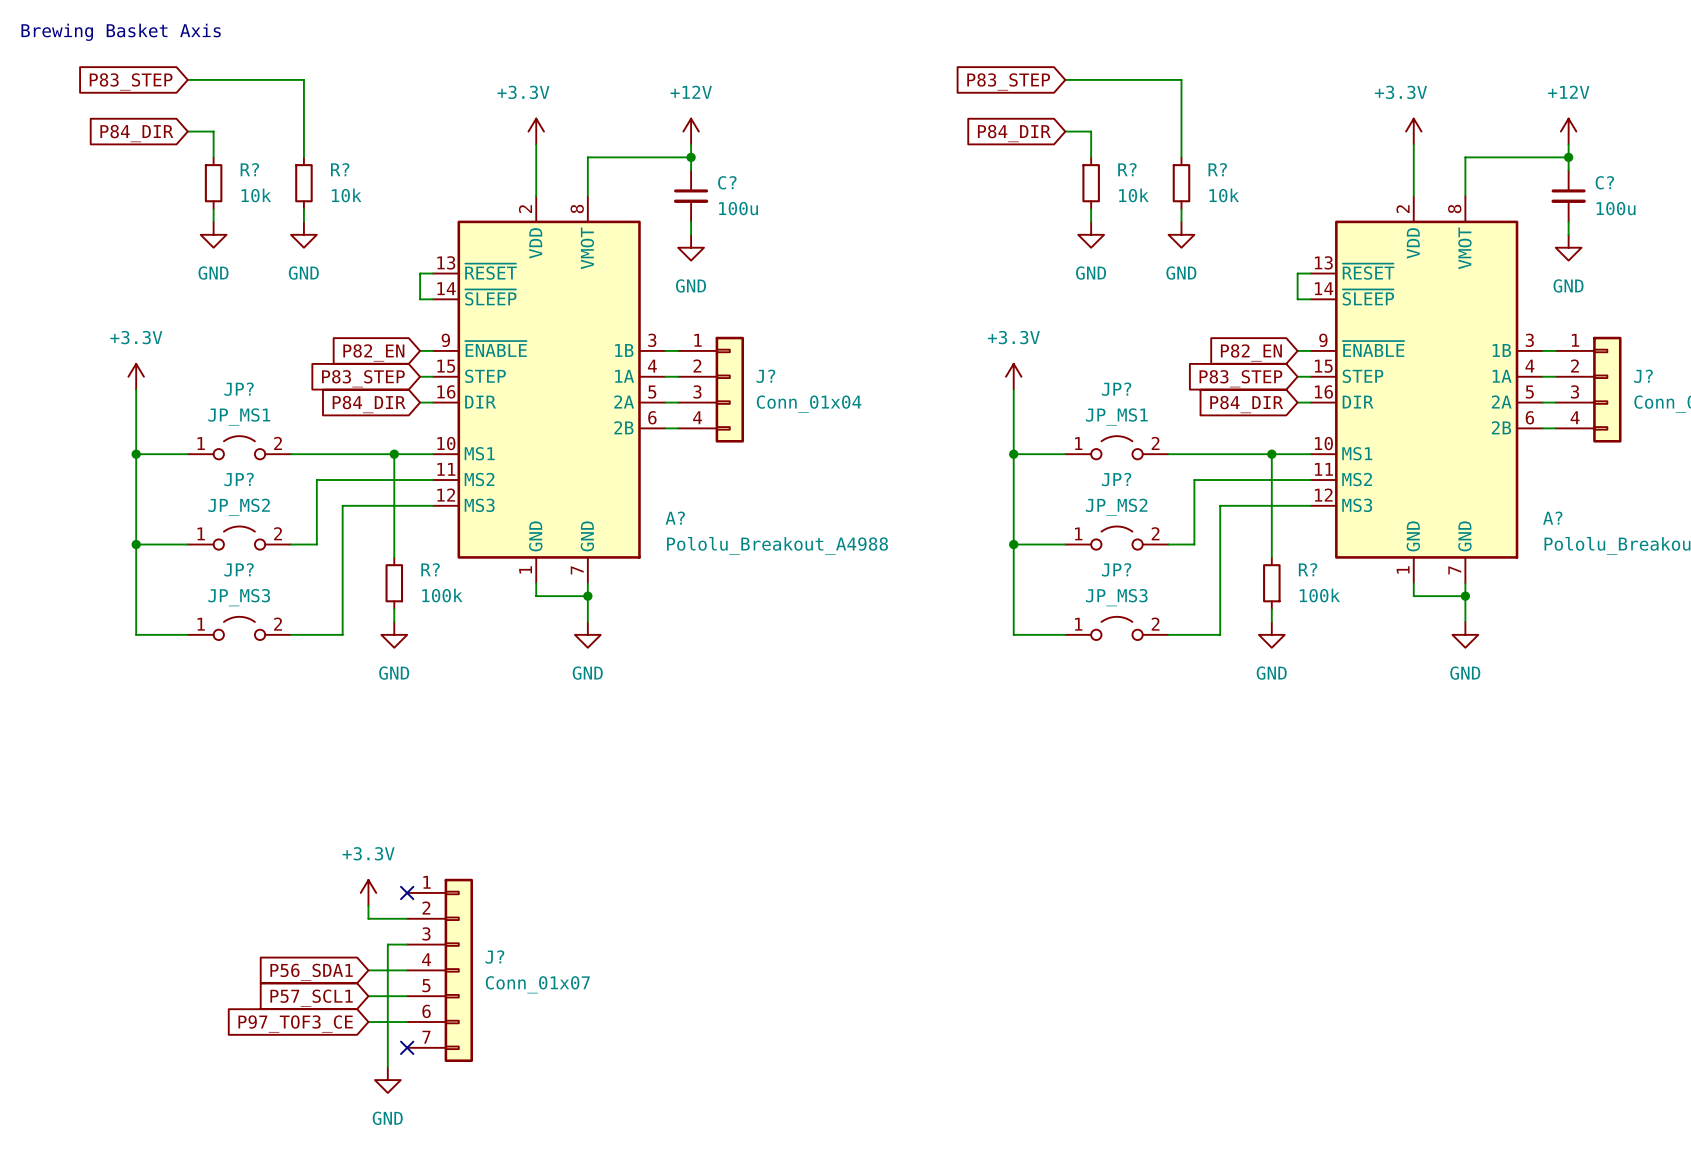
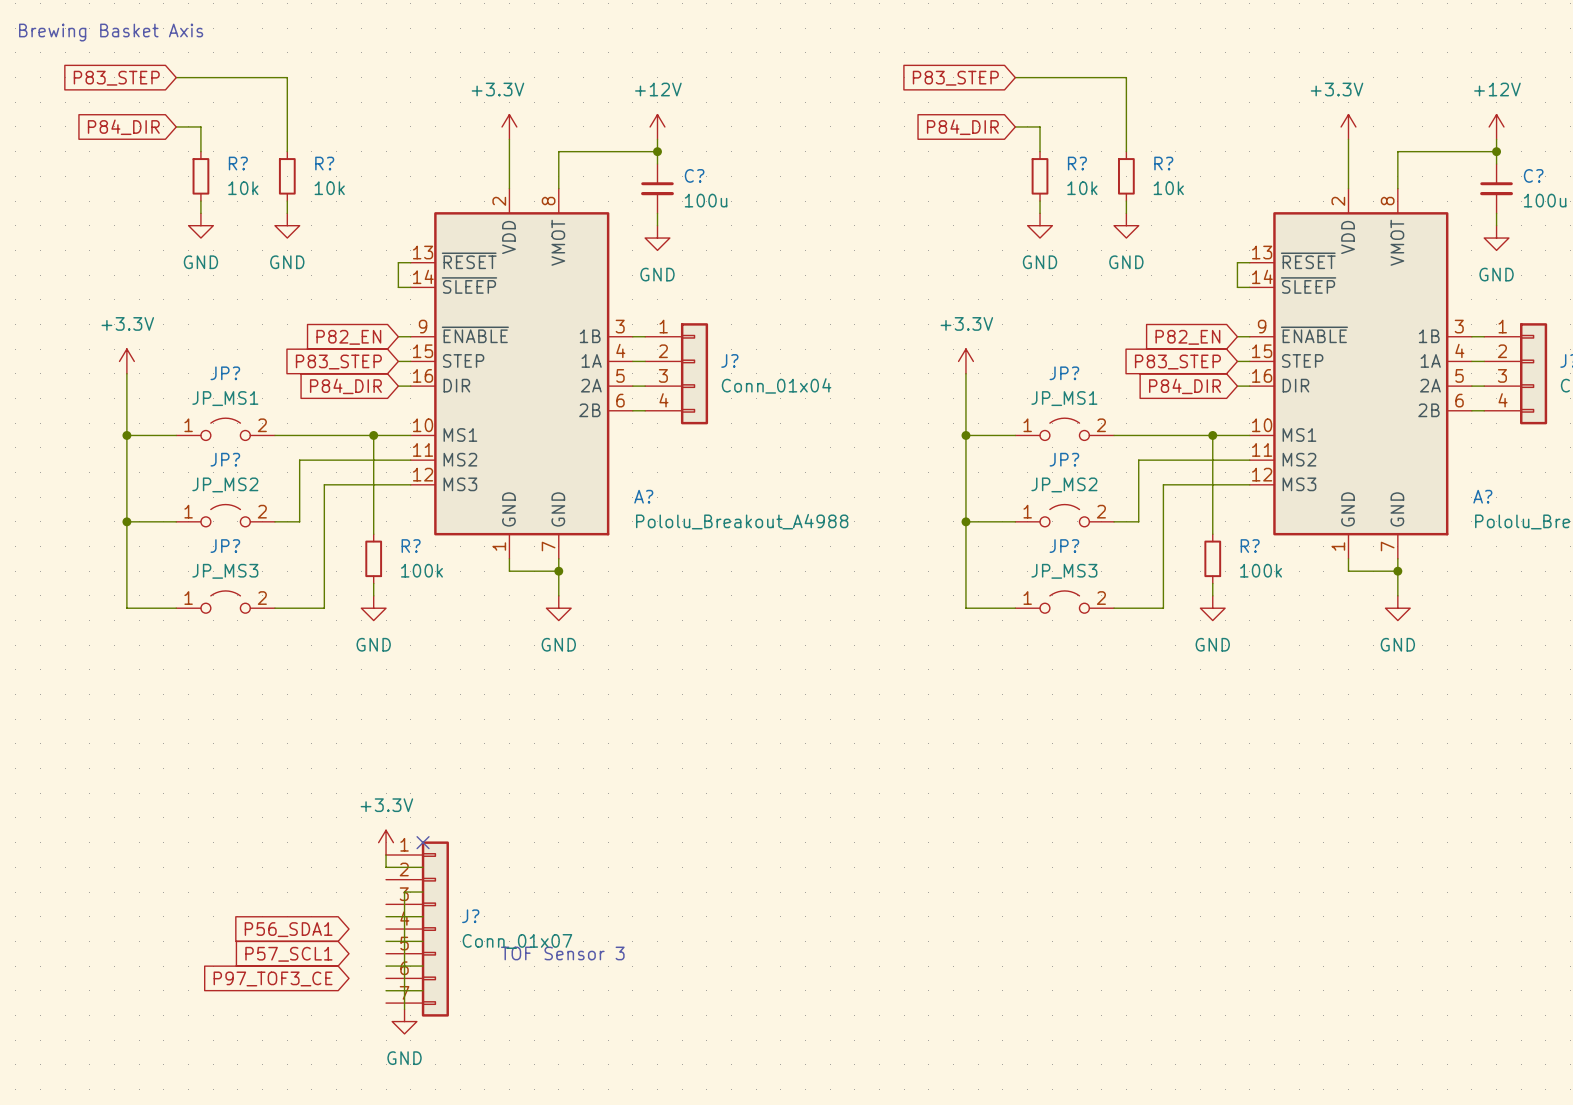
power symbol position: +3.3V (368, 892) -> +3.3V (386, 842)
no-connect mark position: (407, 892) -> (423, 842)
wire: (368, 905) (368, 918) (407, 918) -> (386, 854) (386, 867) (423, 867)
wire: (407, 944) (387, 944) (387, 1067) -> (423, 892) (404, 892) (404, 1009)
wire: (368, 970) (407, 970) -> (386, 916) (423, 916)
text: none -> TOF Sensor 3 (562, 953)
wire: (368, 996) (407, 996) -> (386, 941) (423, 941)
wire: (368, 1022) (407, 1022) -> (386, 966) (423, 966)
wire: none -> (386, 990) (423, 990)
no-connect mark: (407, 1047) -> none
power symbol position: GND (387, 1080) -> GND (404, 1021)

